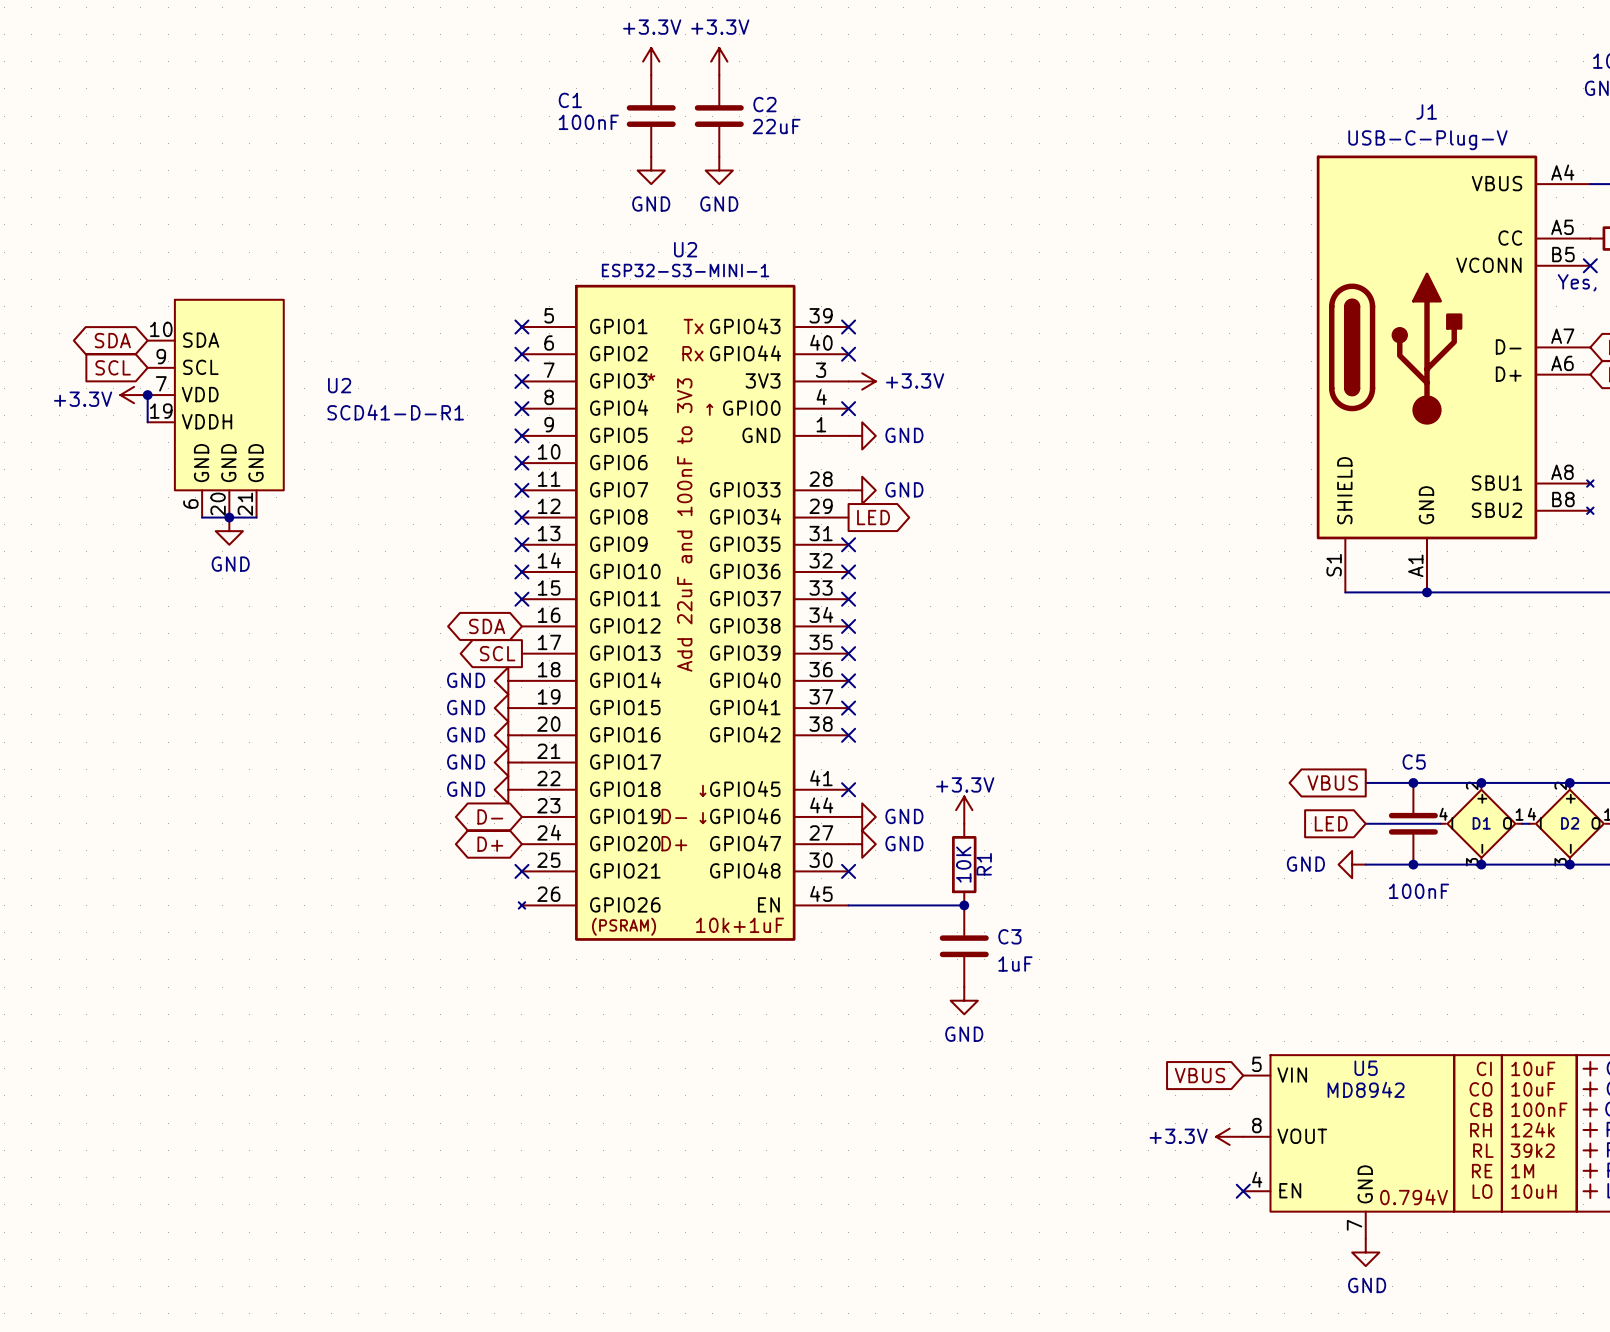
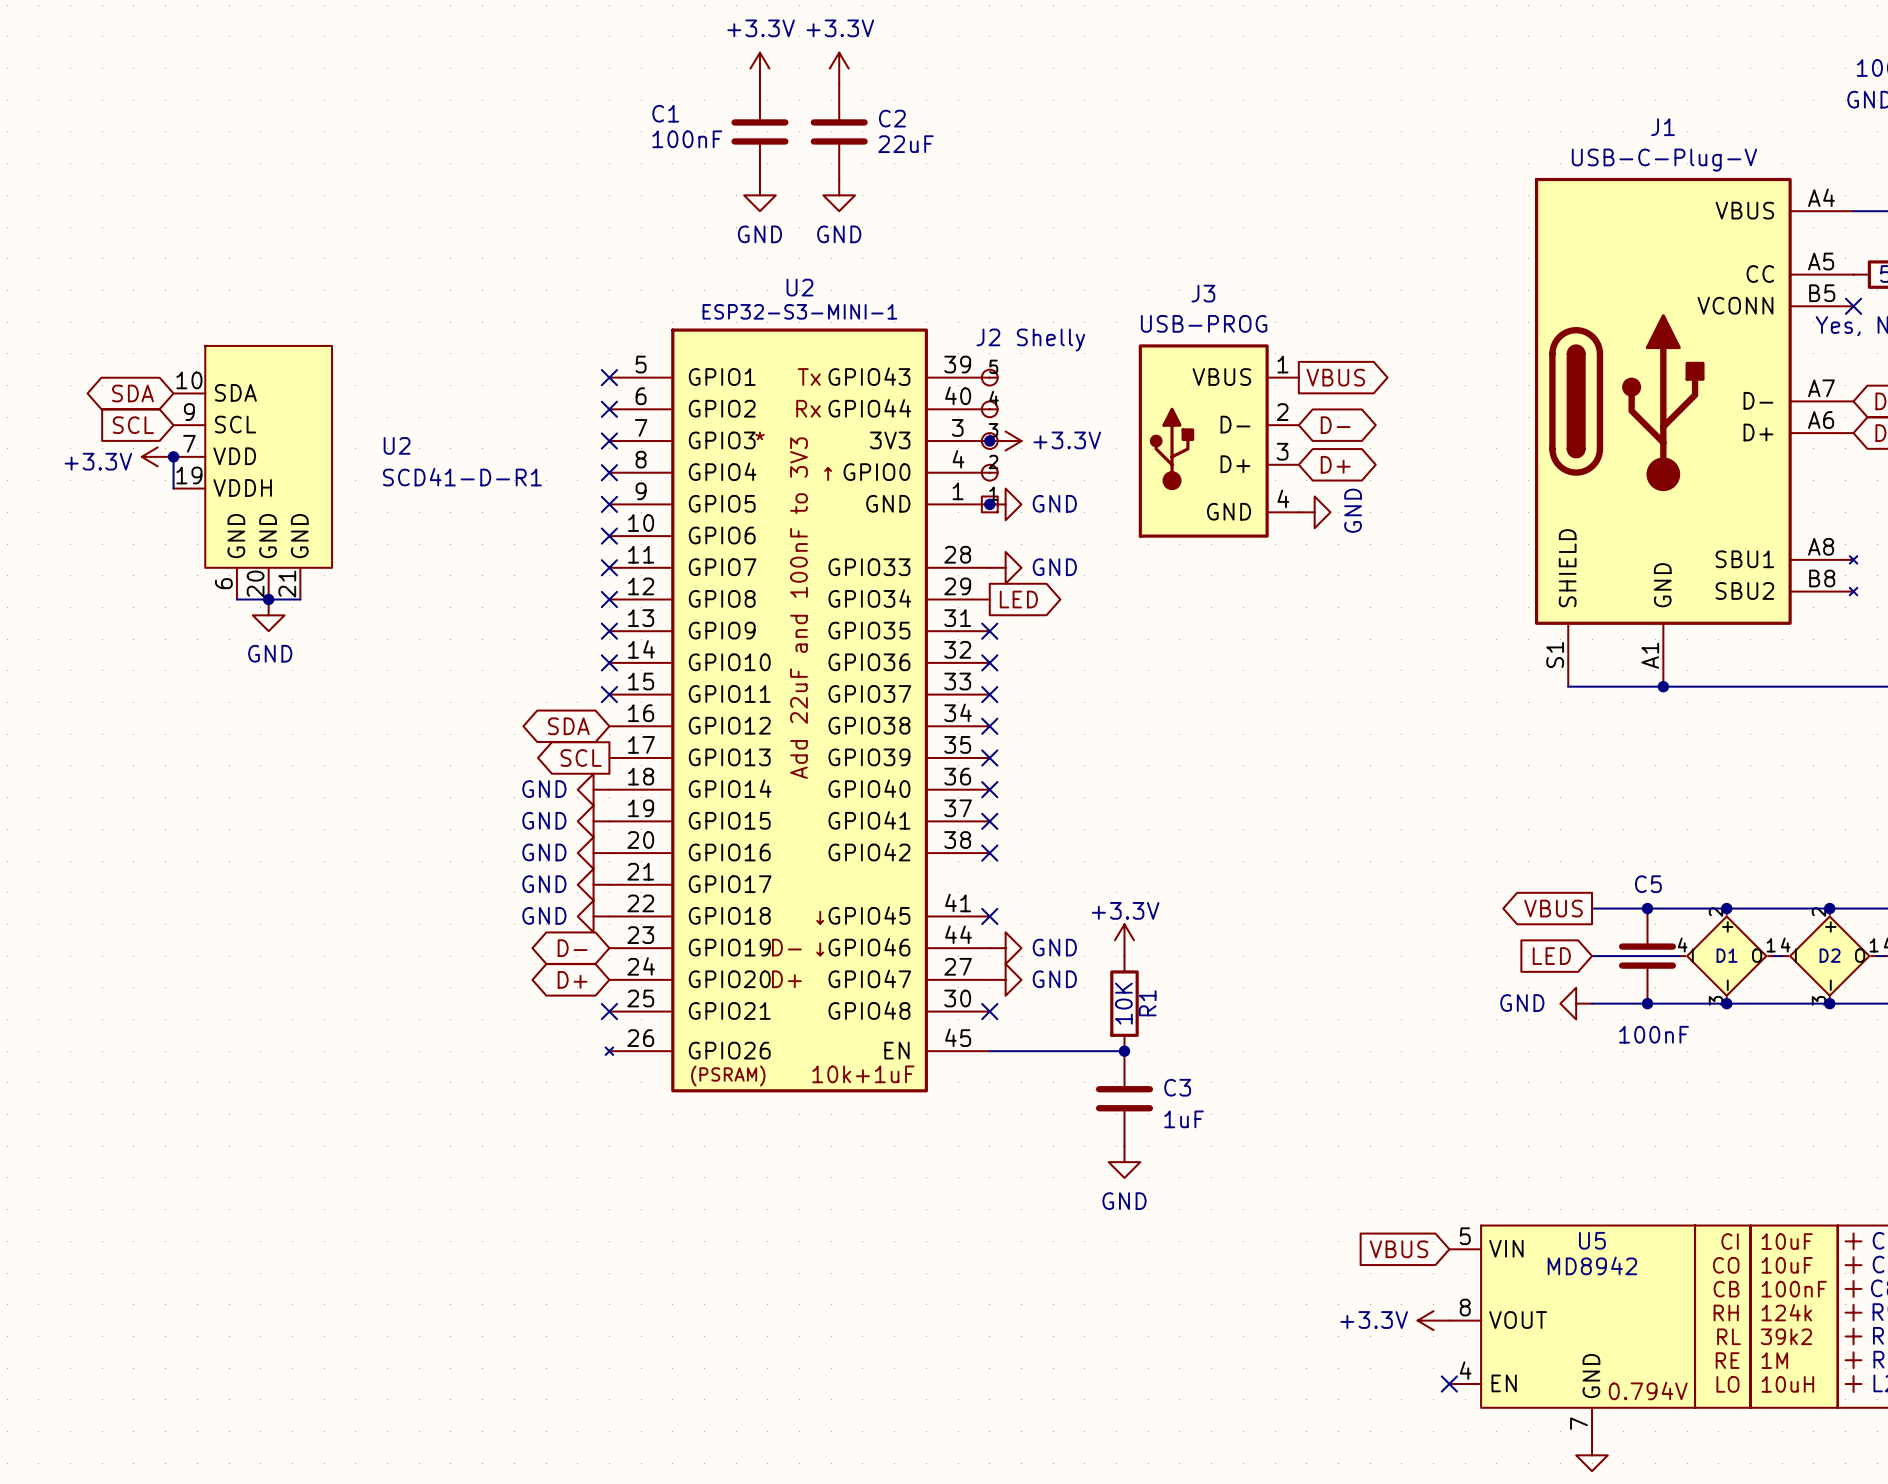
no-connect mark: (848, 327) -> none
global label: none -> VBUS (1335, 377)
no-connect mark: (848, 354) -> none
global label: none -> D- (1335, 425)
junction: none -> (989, 441)
J2: none -> Shelly (989, 441)
J3: none -> USB-PROG (1218, 441)
global label: none -> D+ (1335, 464)
no-connect mark: (848, 408) -> none
junction: none -> (989, 504)
power symbol: none -> GND (1314, 512)

